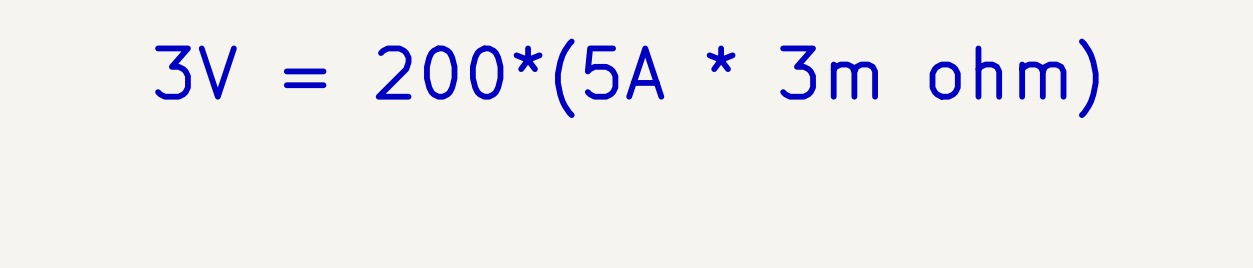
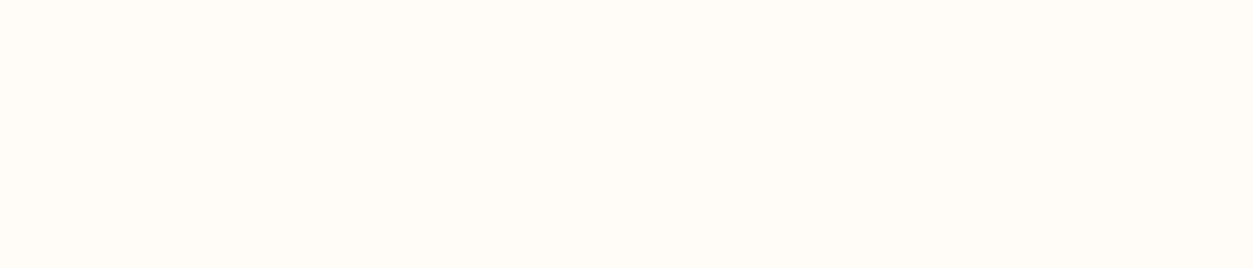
text: 3V = 200*(5A * 3m ohm) (626, 78) -> none

